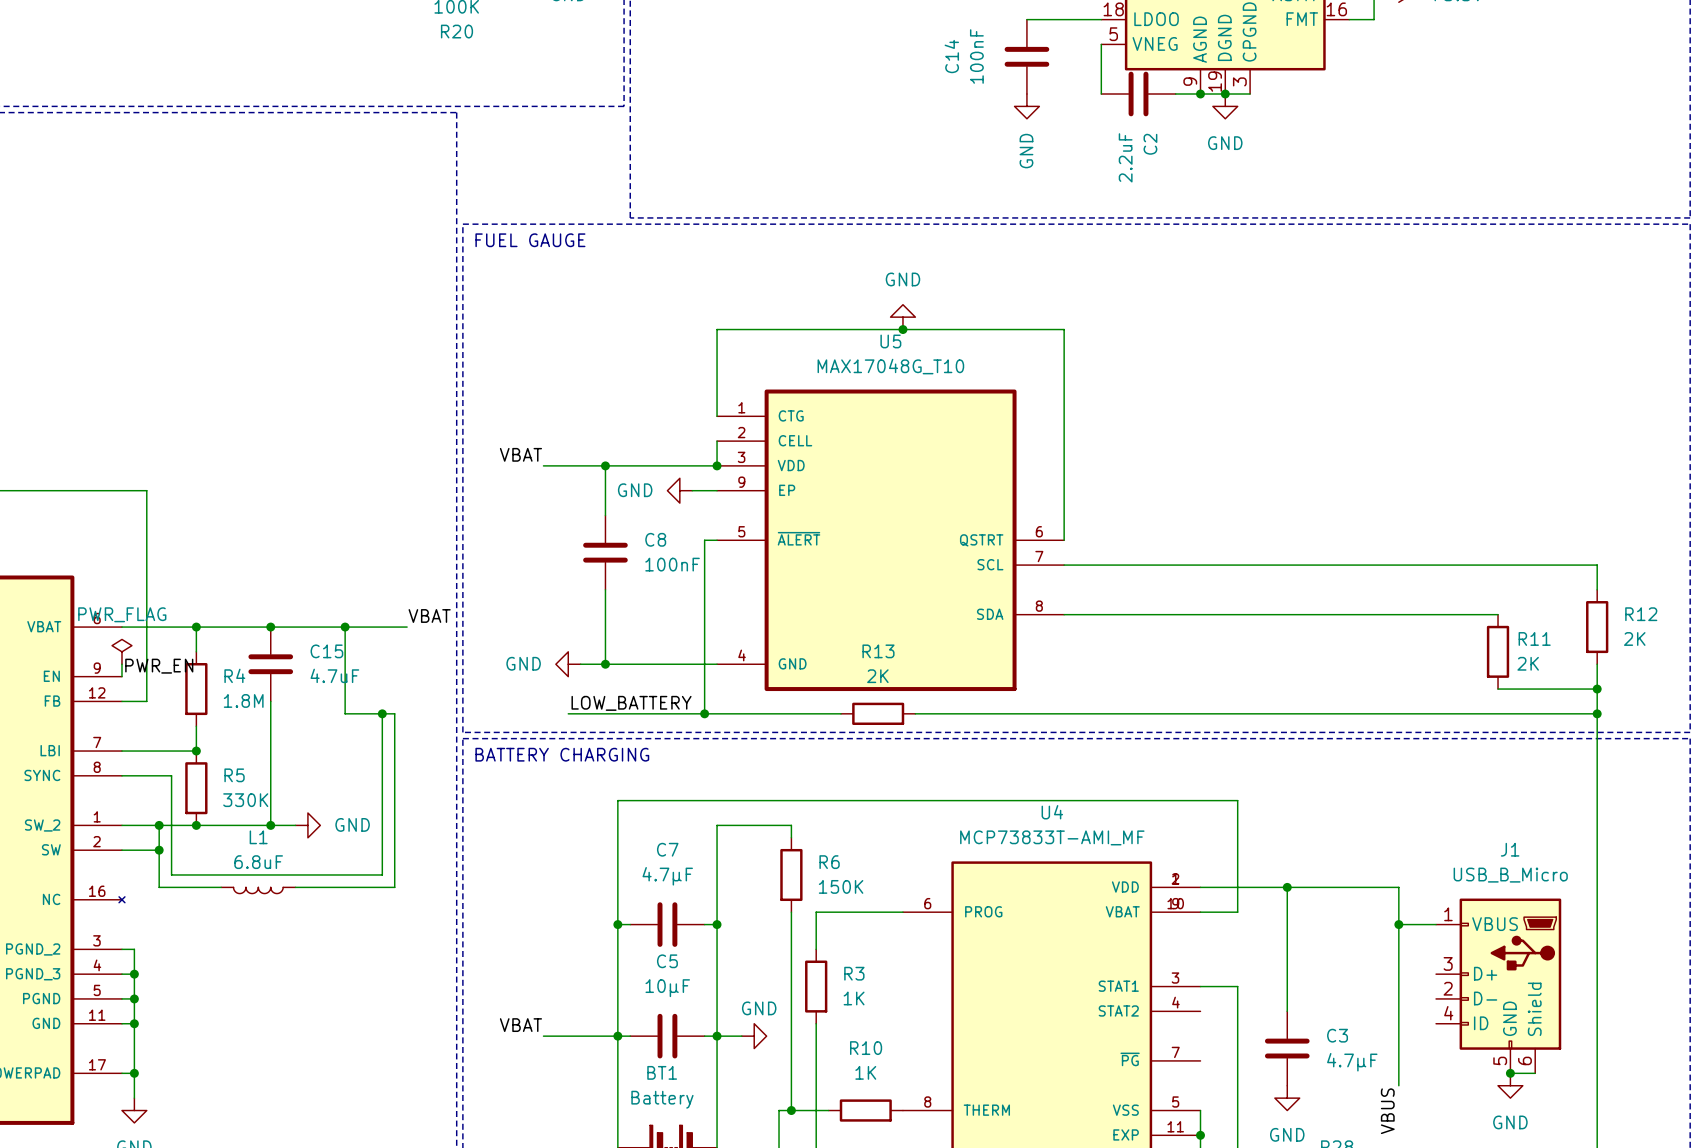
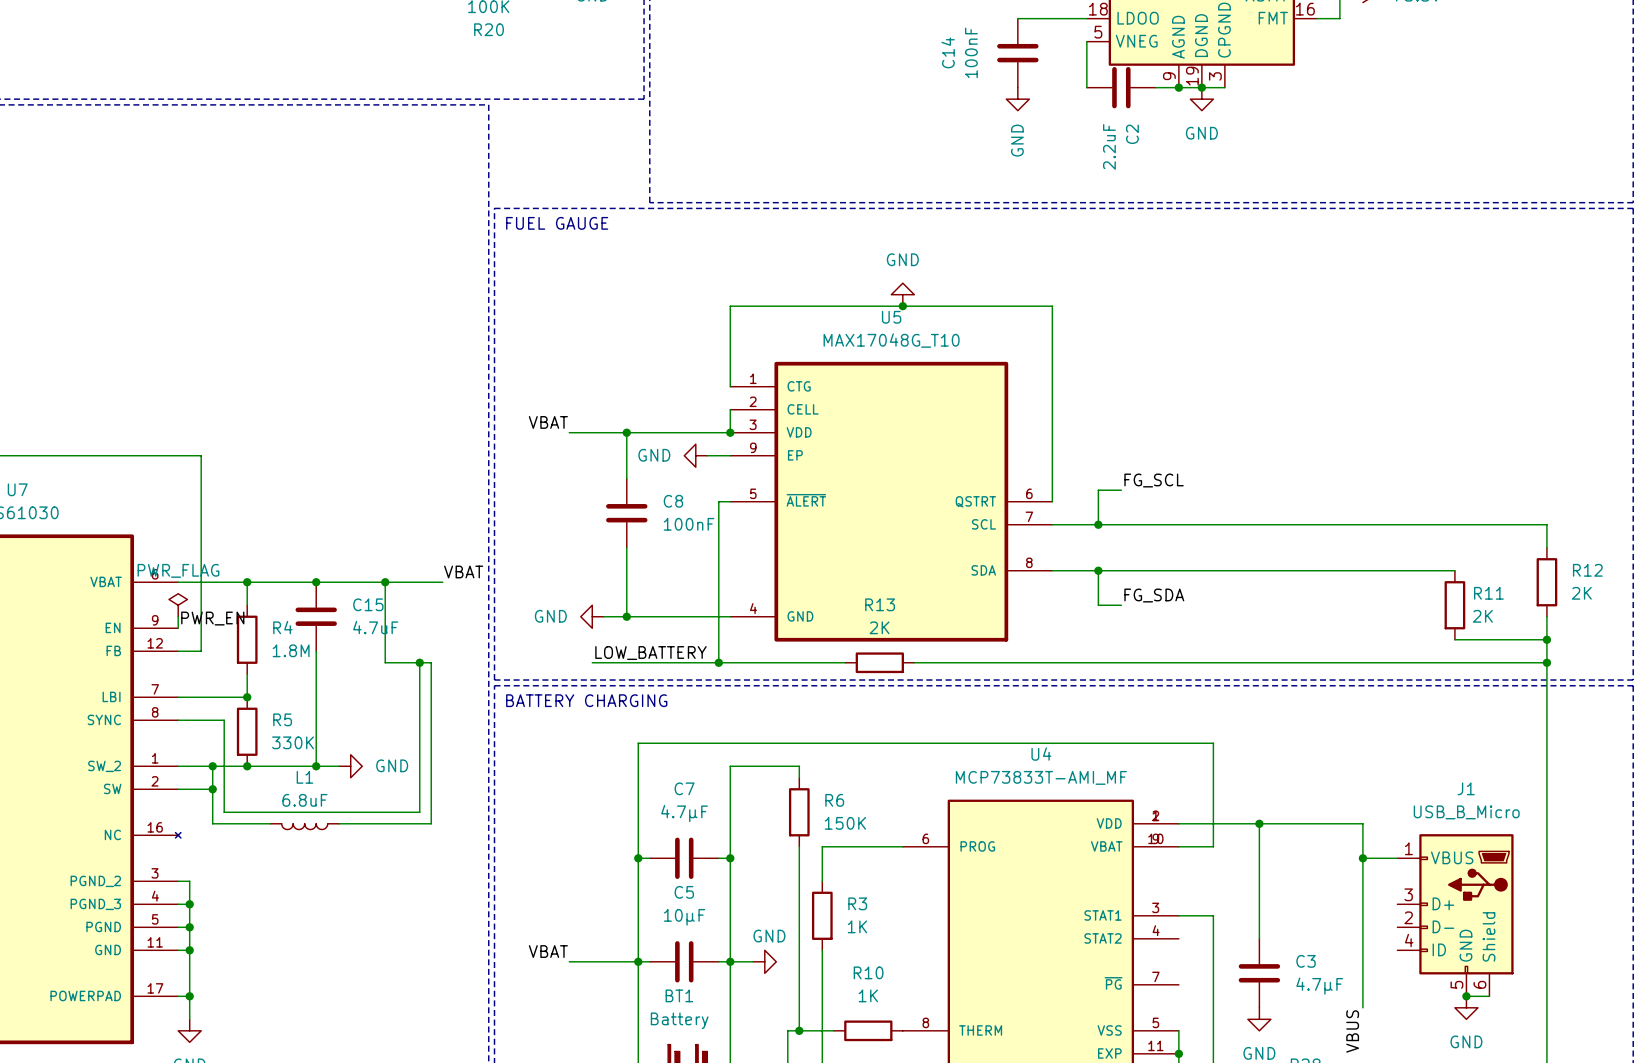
label: none -> FG_SCL (1154, 480)
wire: none -> (1121, 490) (1098, 490) (1098, 524)
junction: none -> (1098, 524)
wire: none -> (1098, 570) (1098, 605) (1121, 605)
junction: none -> (1098, 570)
label: none -> FG_SDA (1154, 595)

